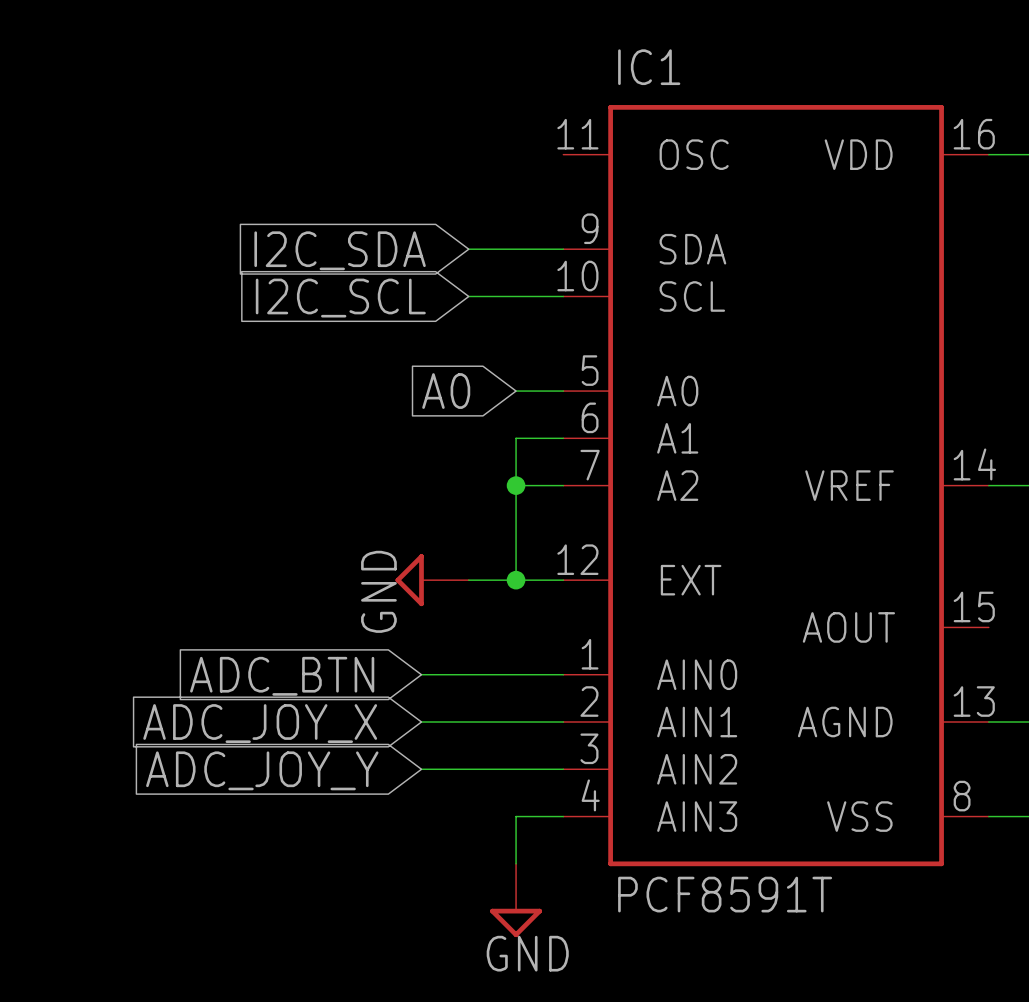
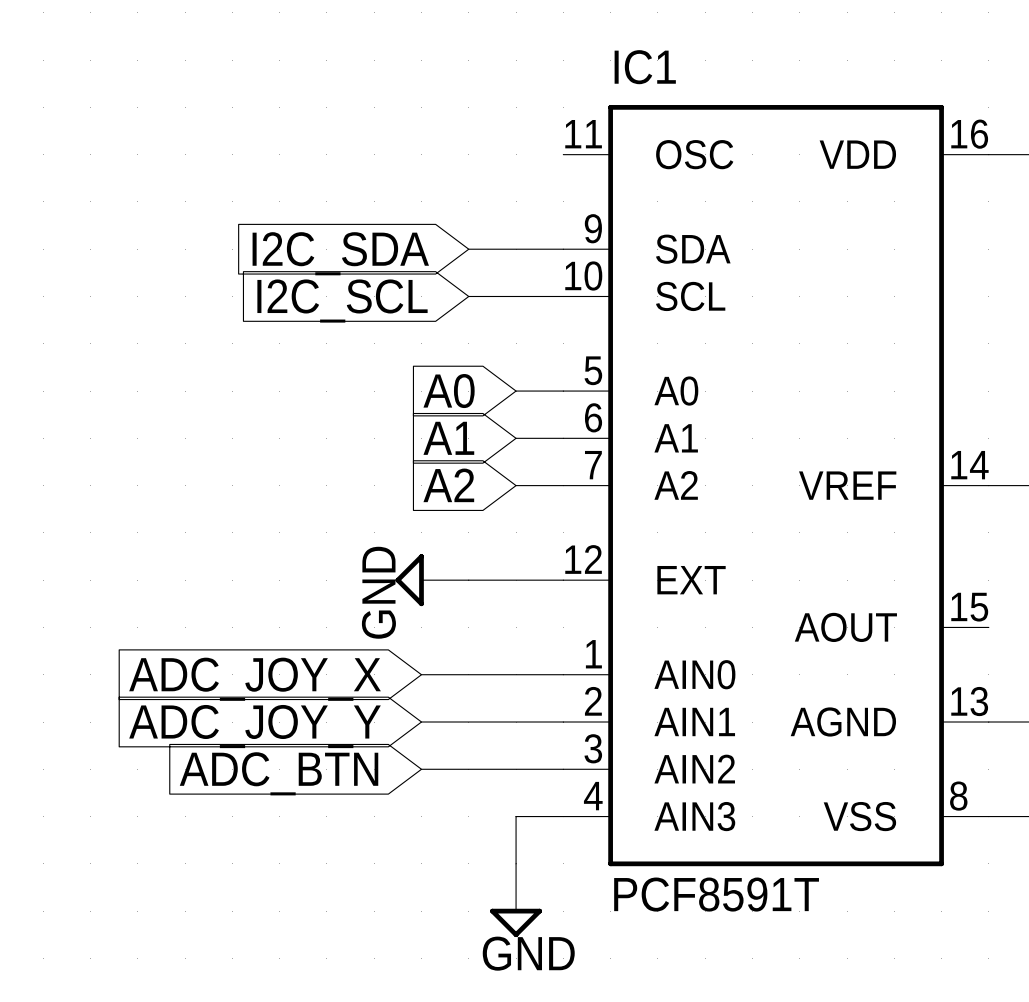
global label: none -> A1 (448, 438)
wire: (516, 438) (516, 580) -> none
global label: none -> A2 (448, 485)
junction: (516, 485) -> none
junction: (516, 580) -> none
global label: ADC_BTN (282, 676) -> ADC_JOY_X (255, 679)
global label: ADC_JOY_X (260, 723) -> ADC_JOY_Y (255, 726)
global label: ADC_JOY_Y (262, 770) -> ADC_BTN (279, 773)

